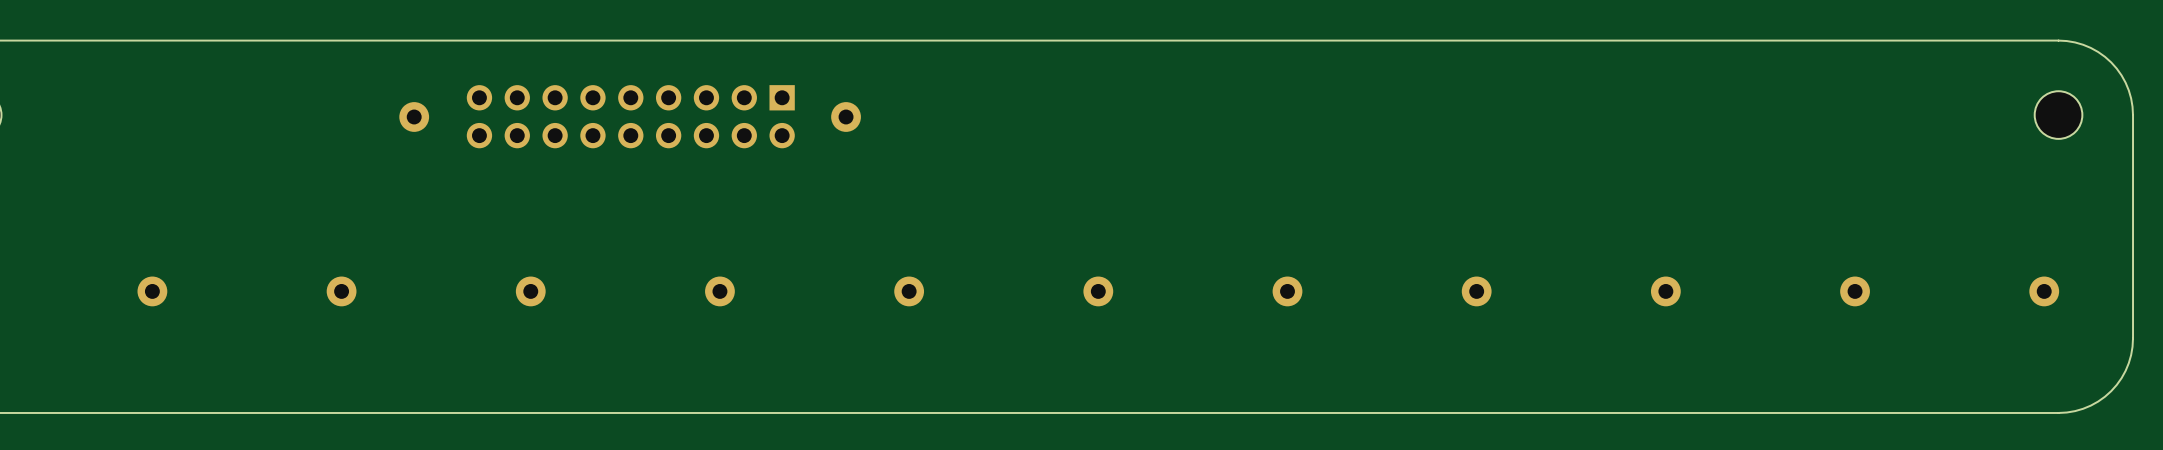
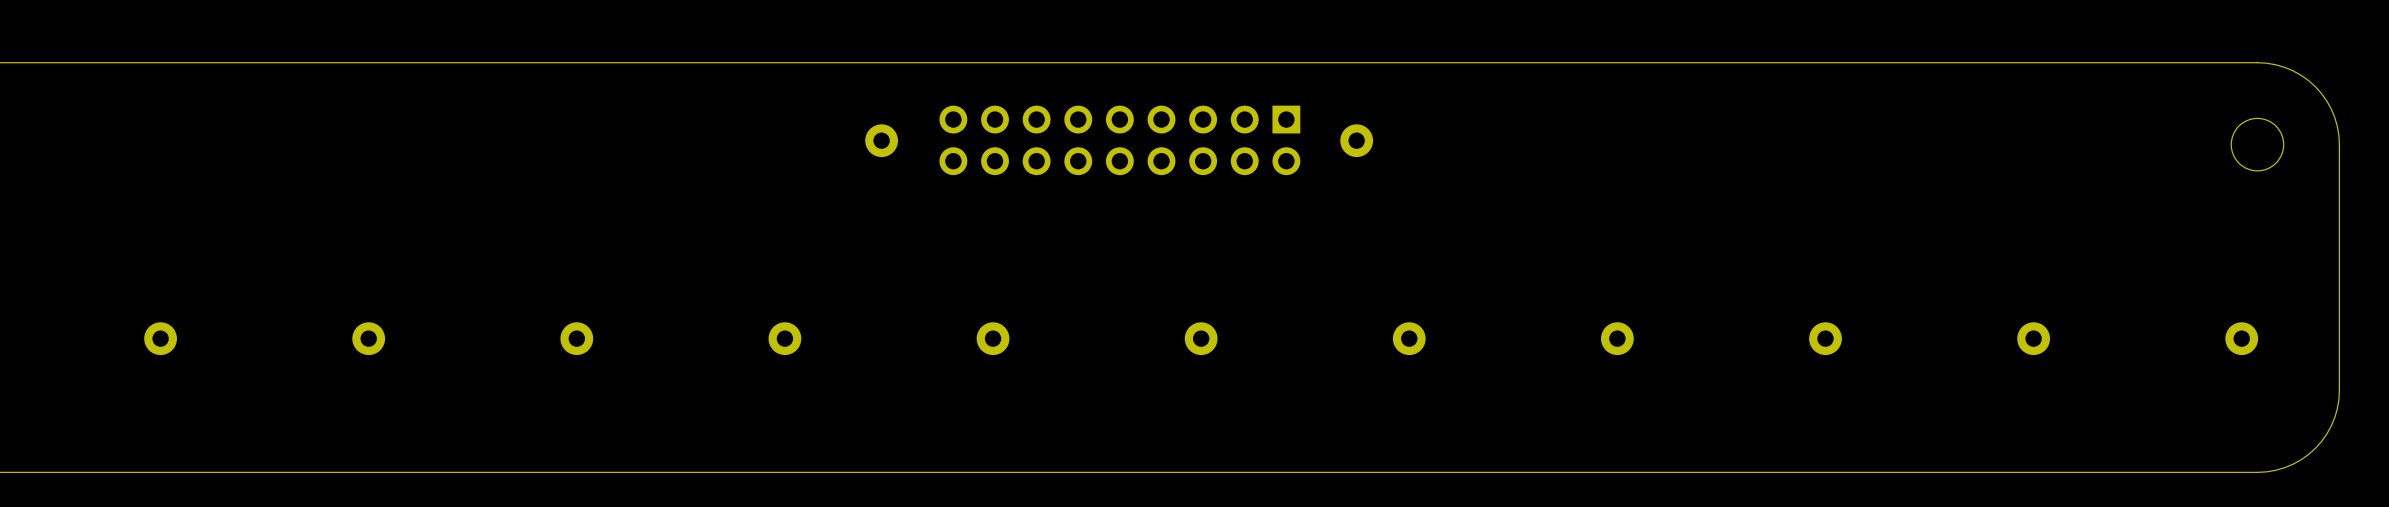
part: none -> (1119, 140)
part: none -> (1356, 140)
part: (414, 116) -> none
part: (630, 116) -> none
part position: (846, 116) -> (881, 140)

